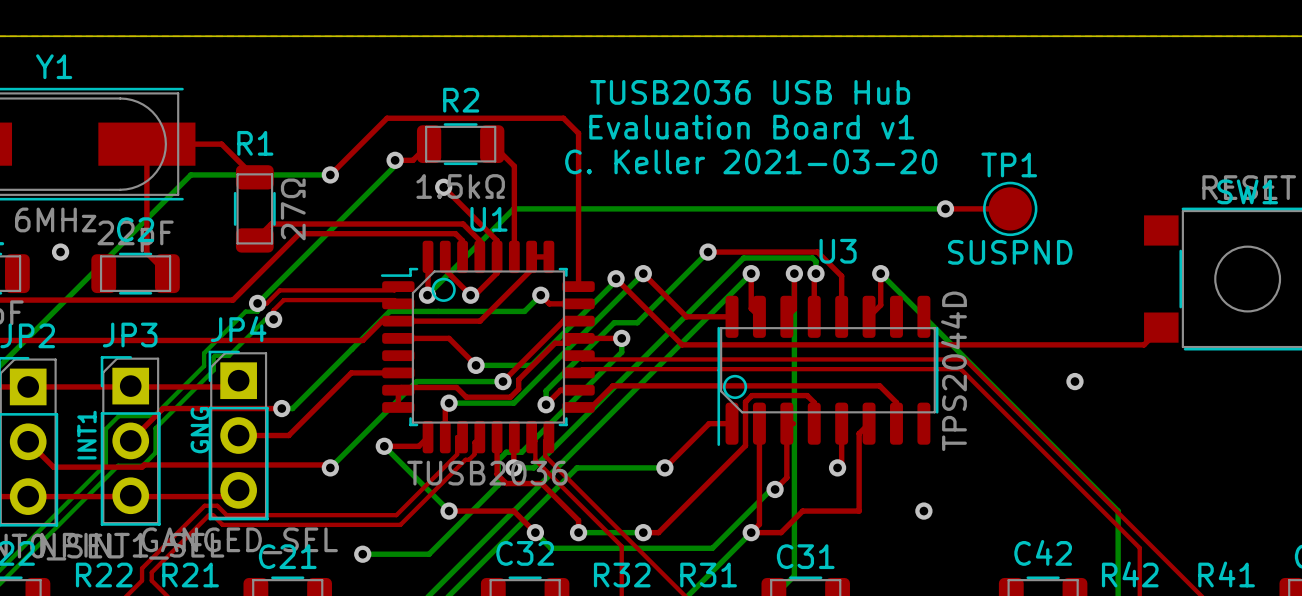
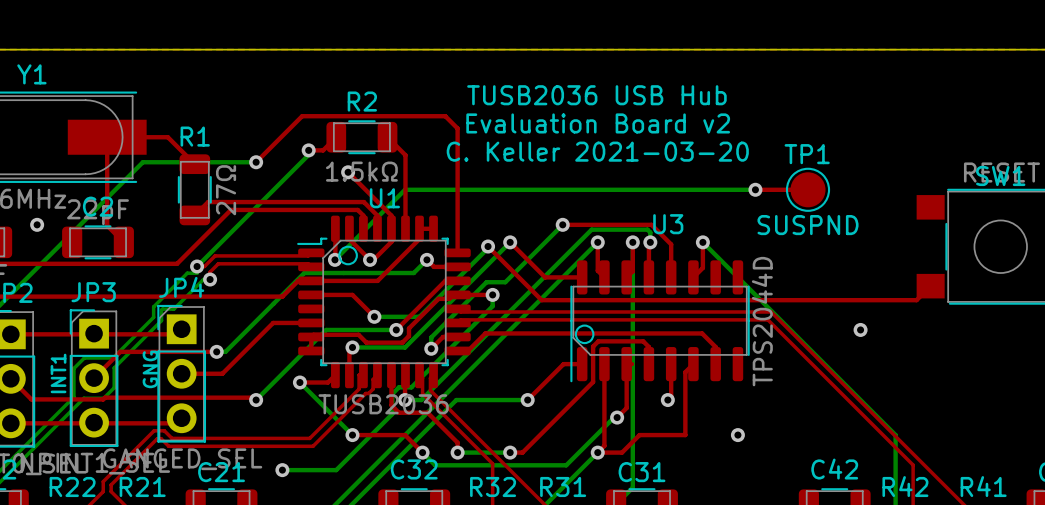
text: Evaluation Board v1 (751, 127) -> Evaluation Board v2 (598, 123)

